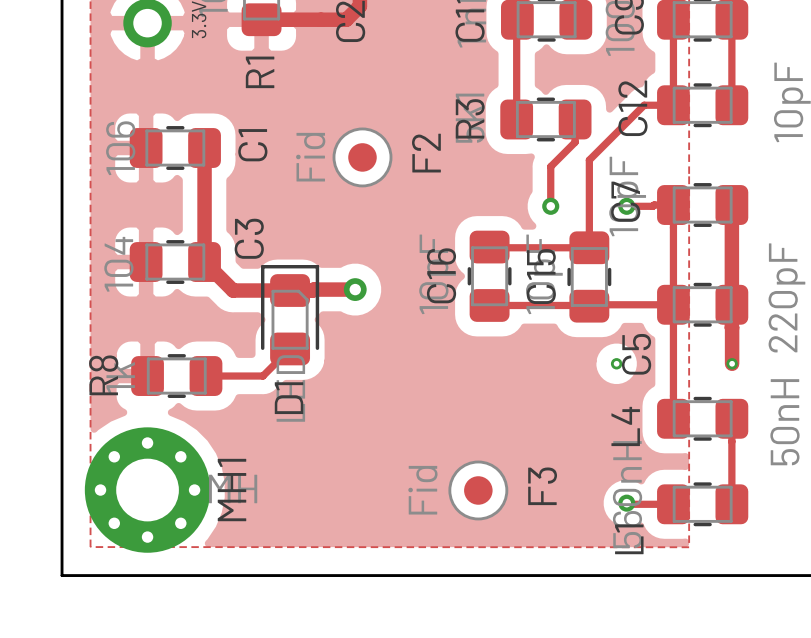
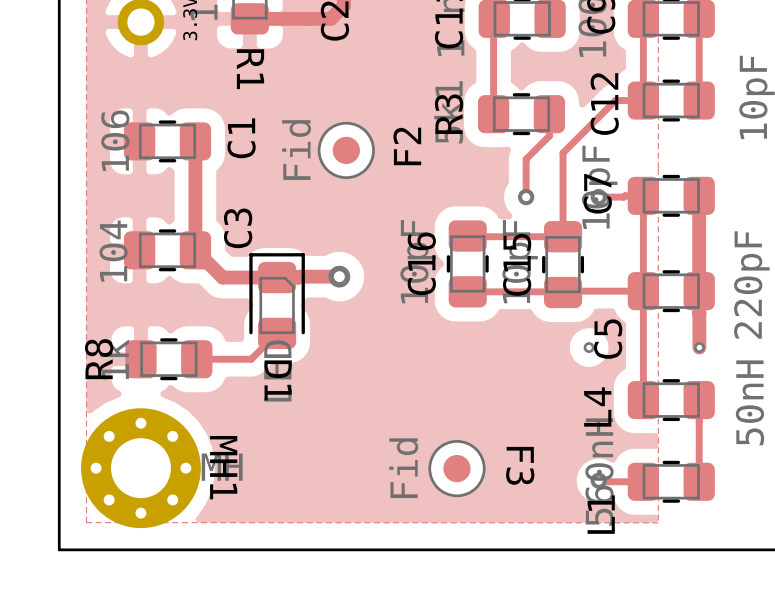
R1 name rotation: 0° (260, 72) -> 180° (250, 69)
D1 name rotation: 0° (289, 398) -> 180° (278, 380)
F3 name rotation: 0° (542, 486) -> 180° (520, 465)
MH1 name rotation: 0° (231, 490) -> 180° (223, 467)

